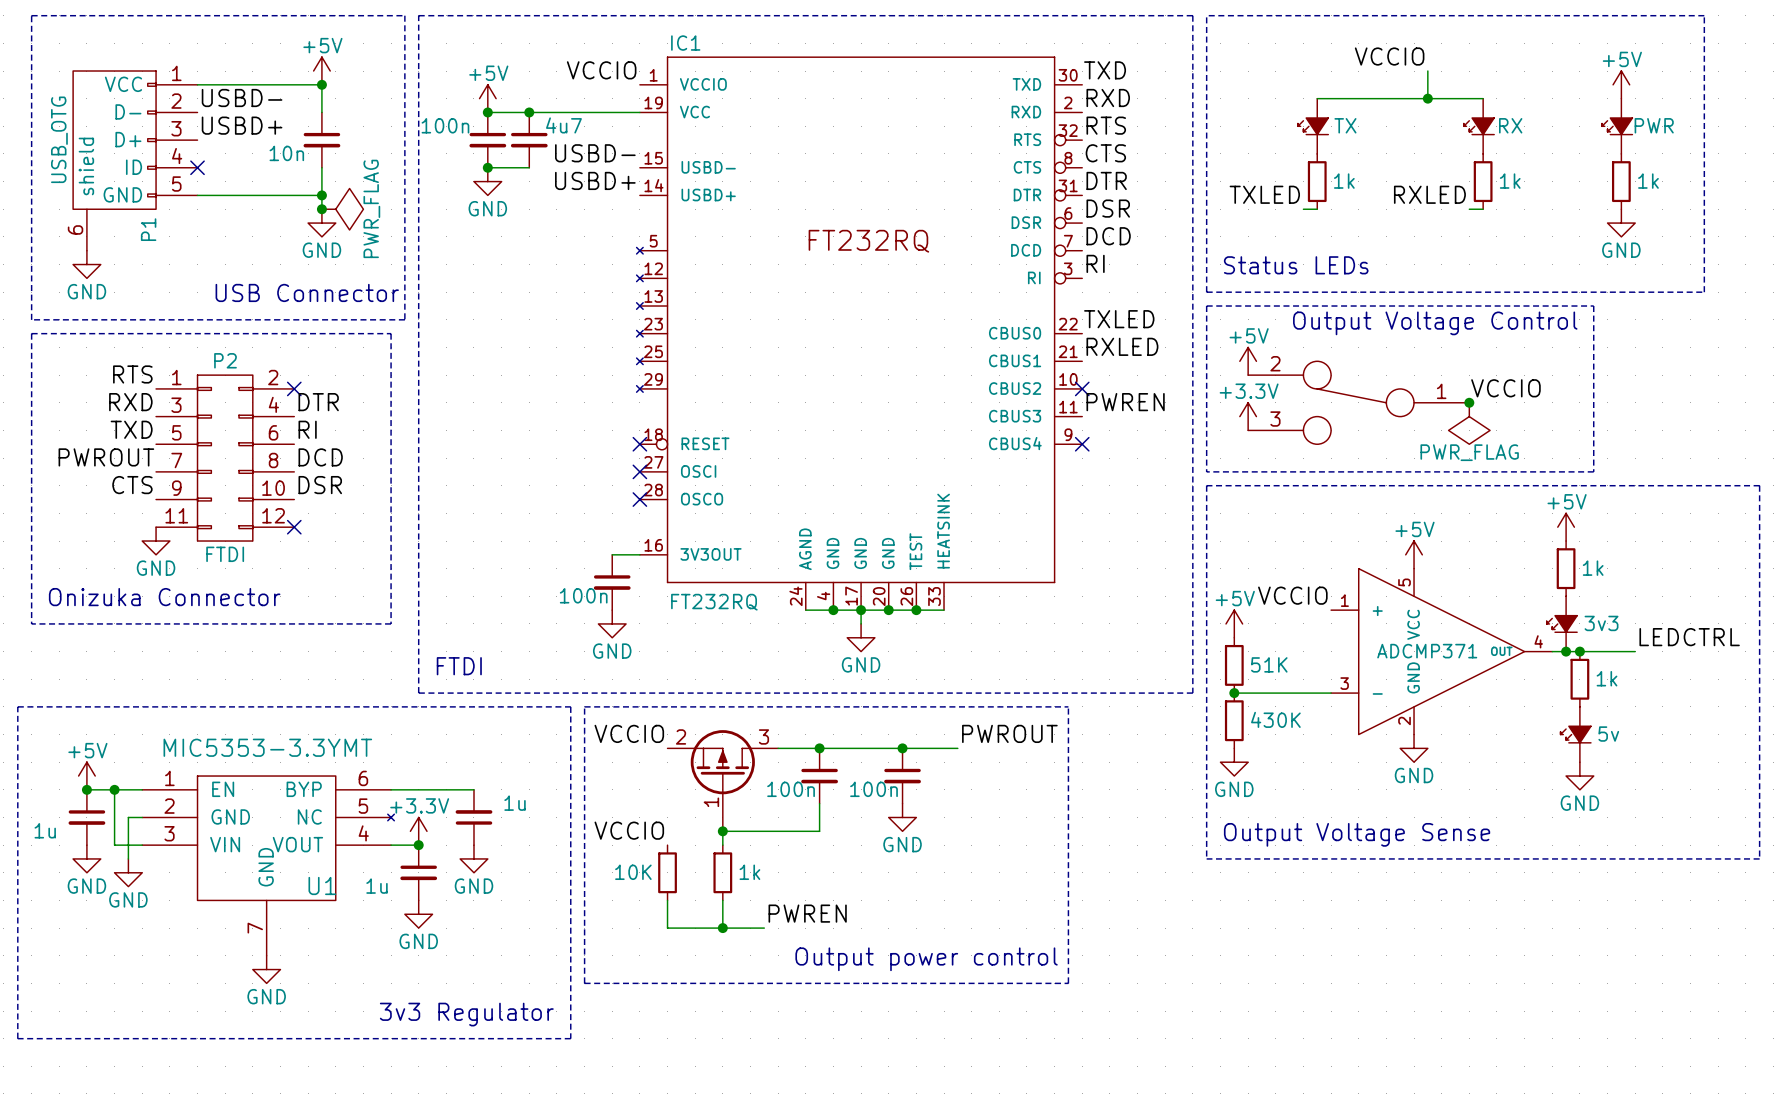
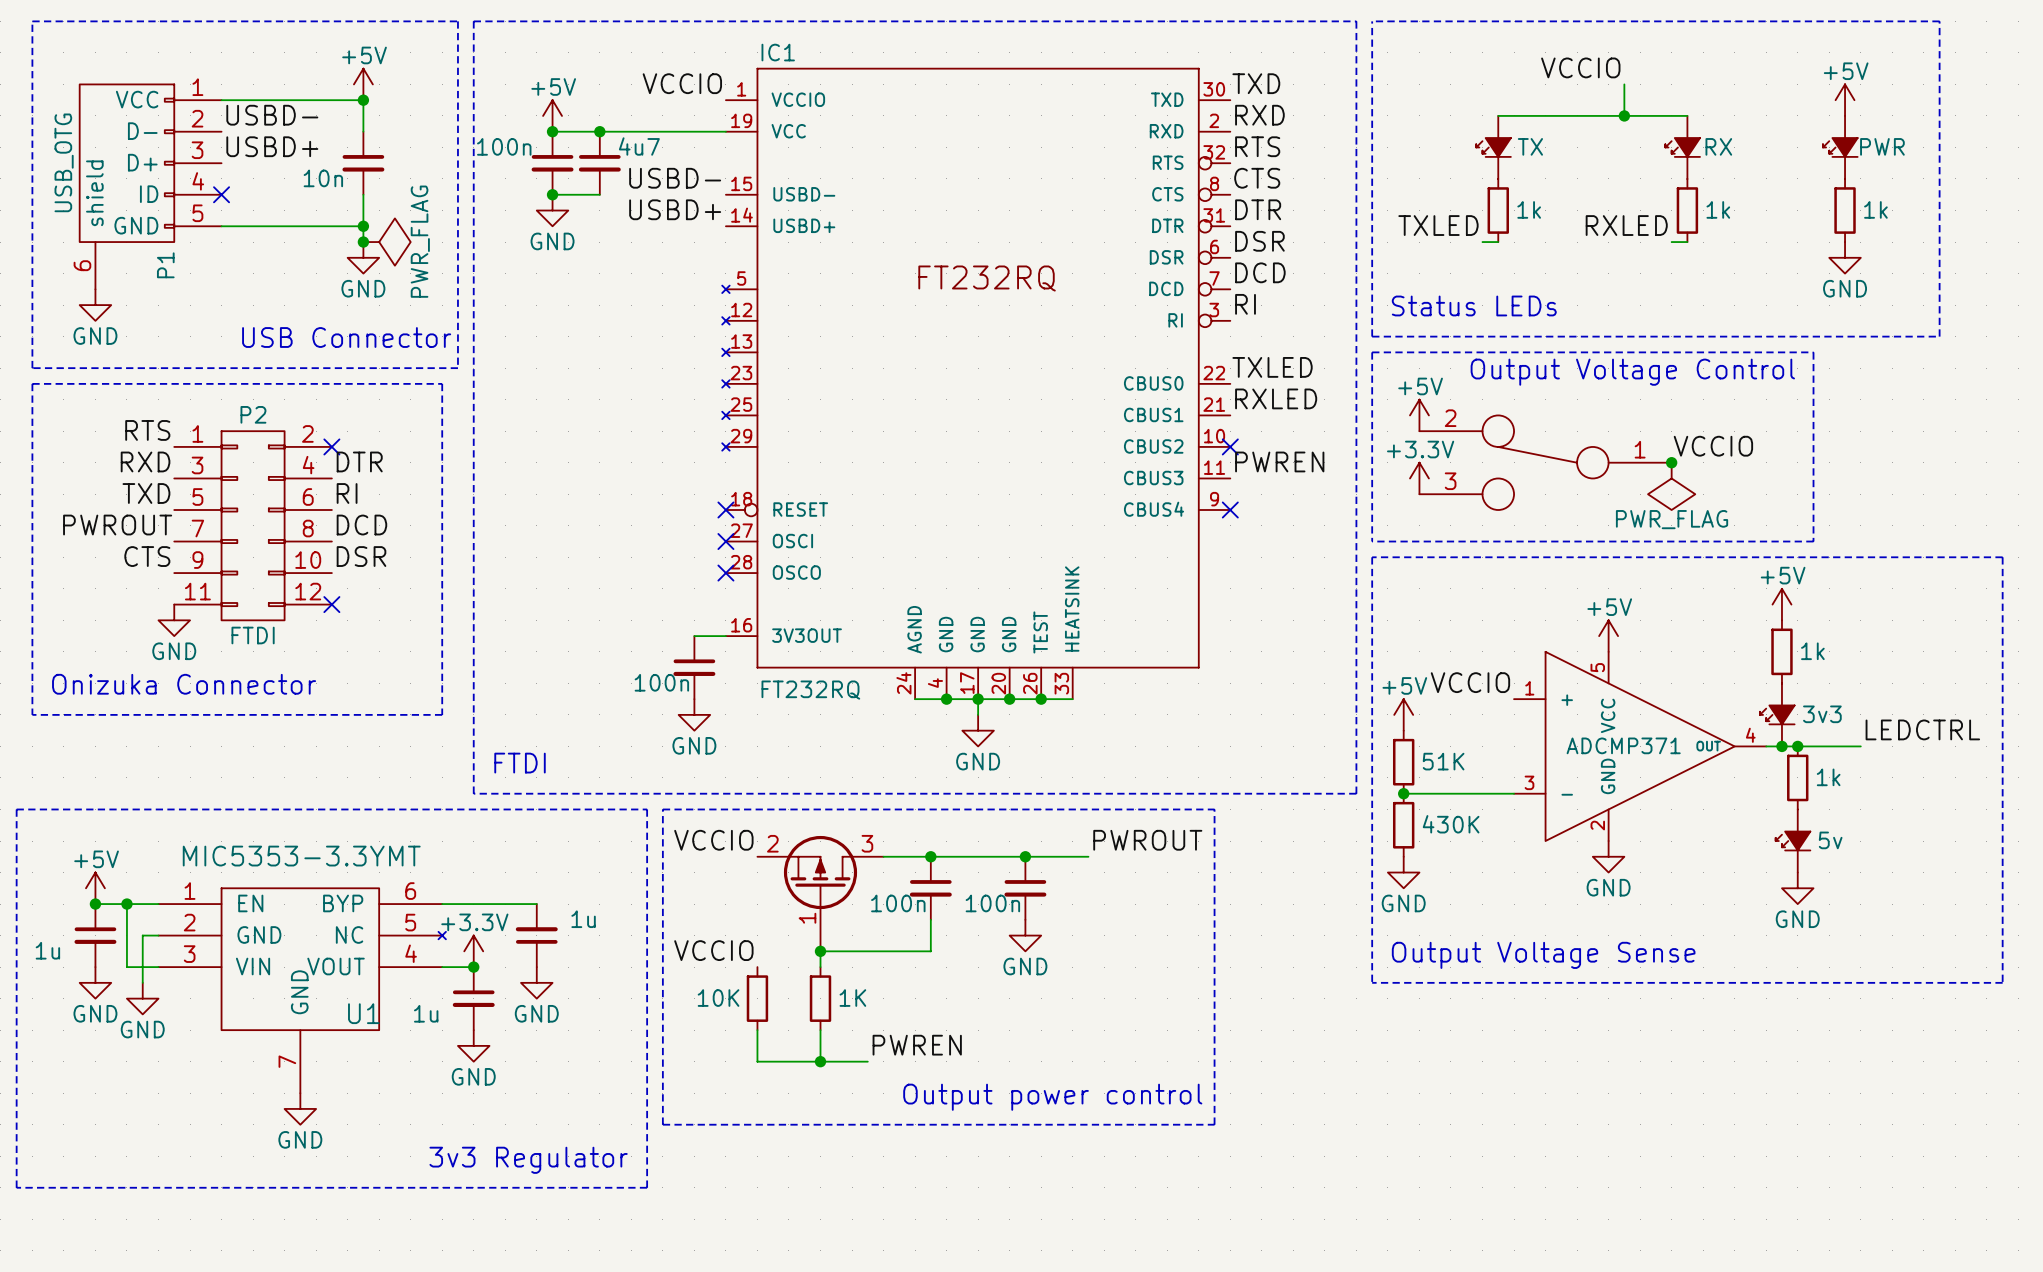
part value: 1k (749, 872) -> 1K (852, 998)

